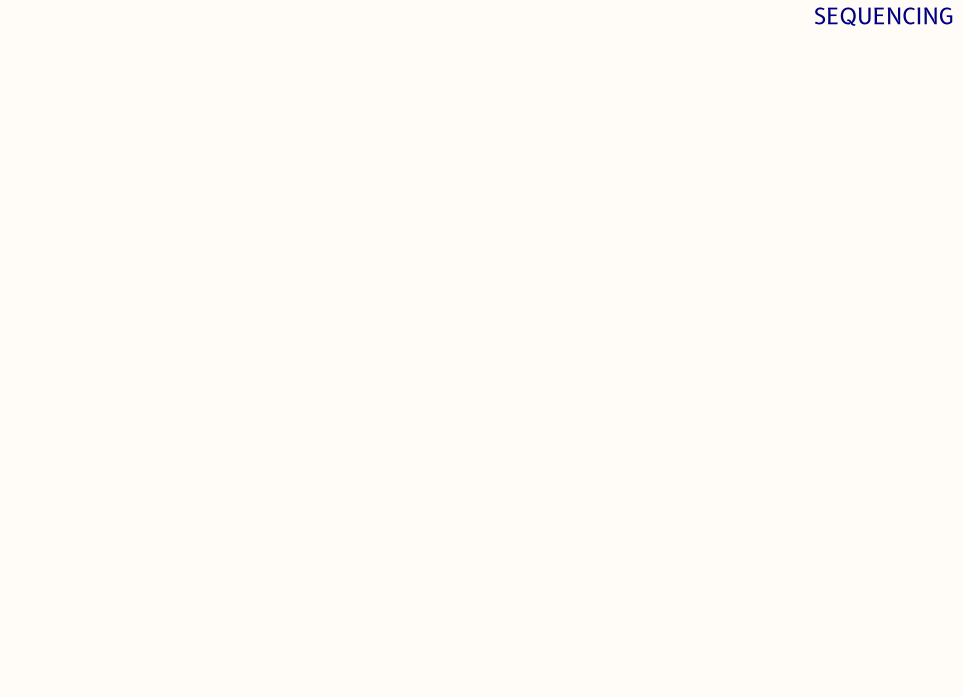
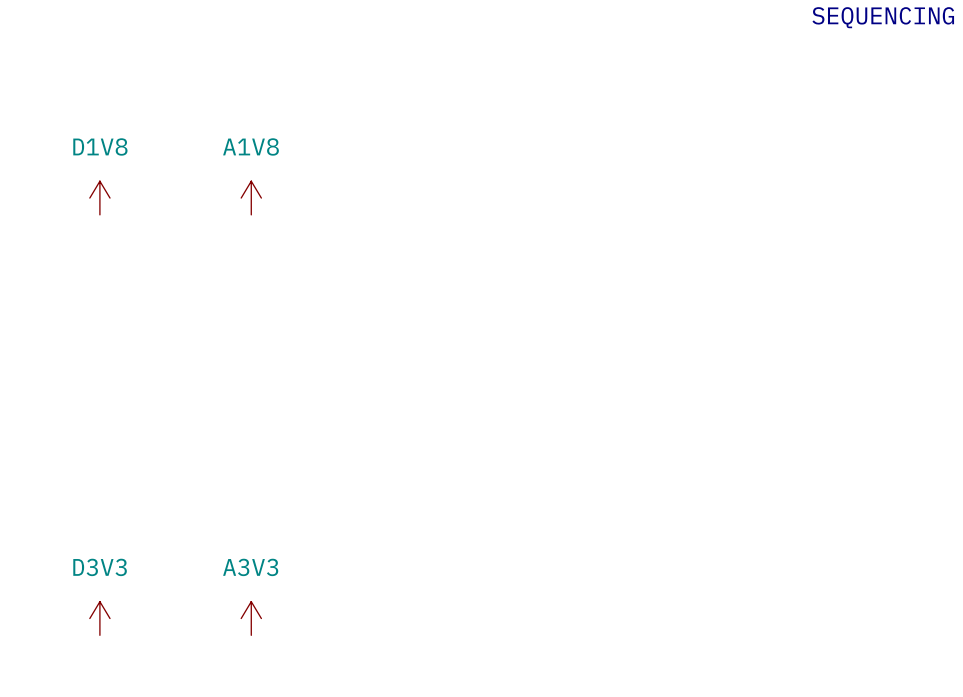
power symbol: none -> D1V8 (99, 198)
power symbol: none -> A1V8 (251, 198)
power symbol: none -> D3V3 (99, 618)
power symbol: none -> A3V3 (251, 618)

